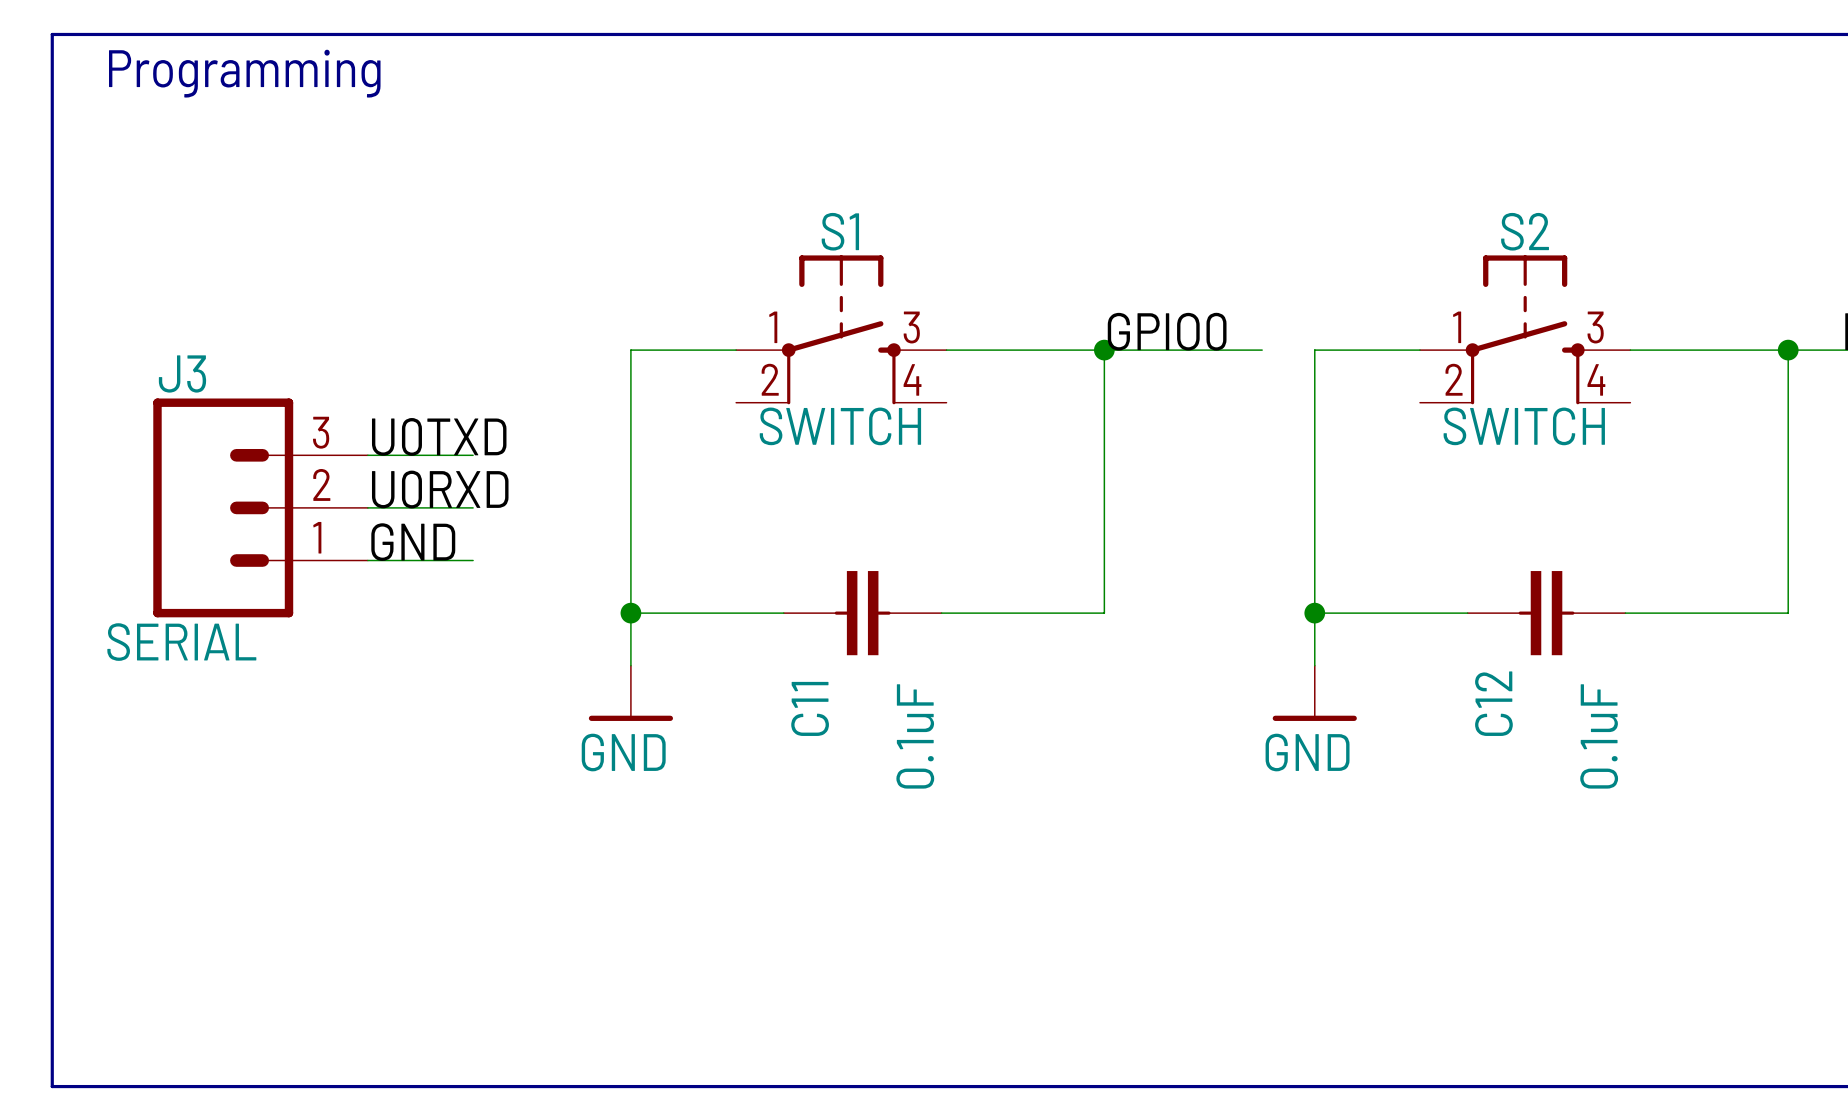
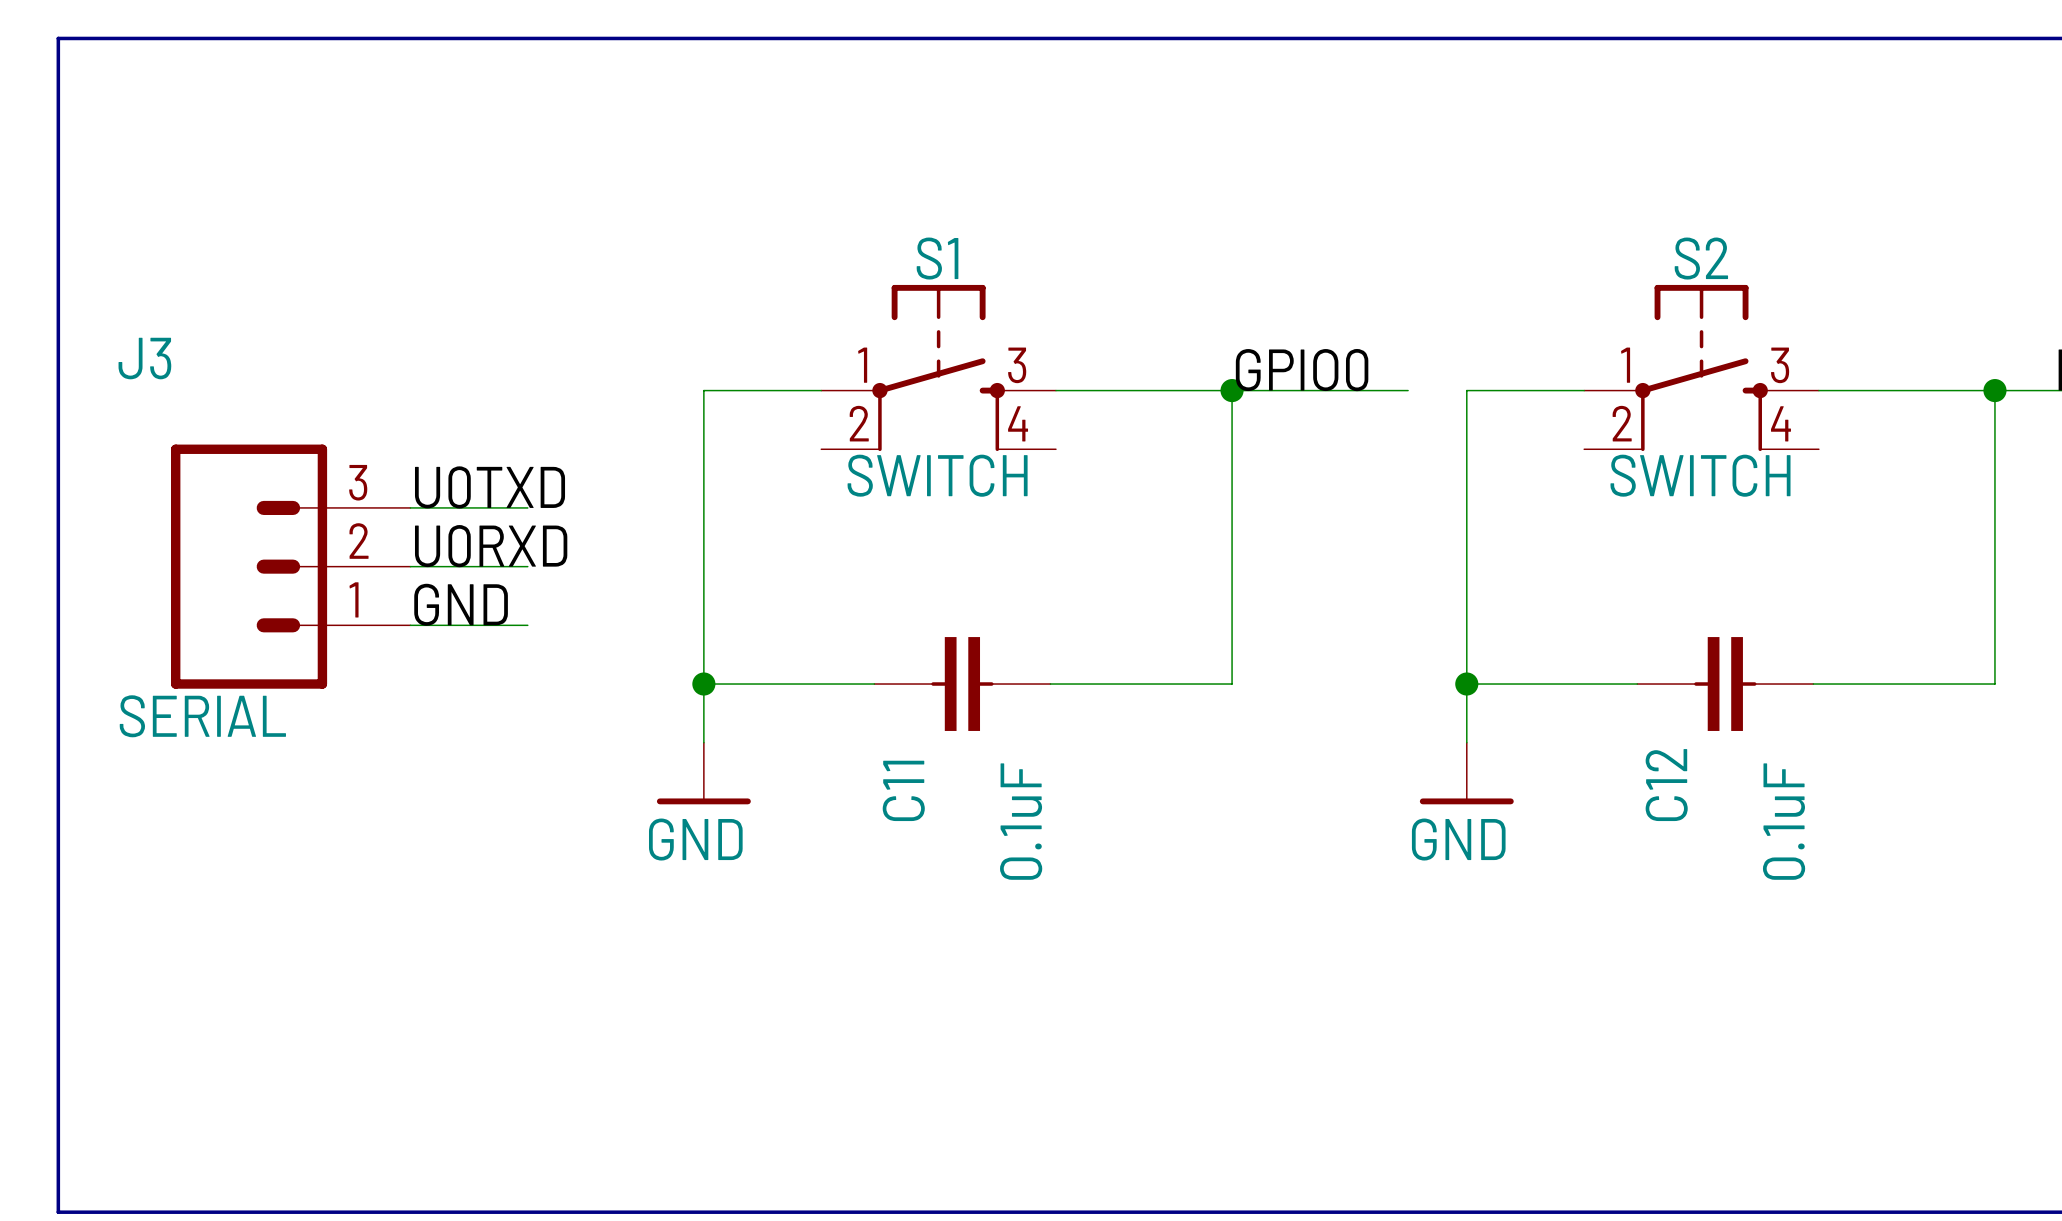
text: Programming (244, 73) -> none
J3 name position: J3 (182, 373) -> J3 (144, 358)

